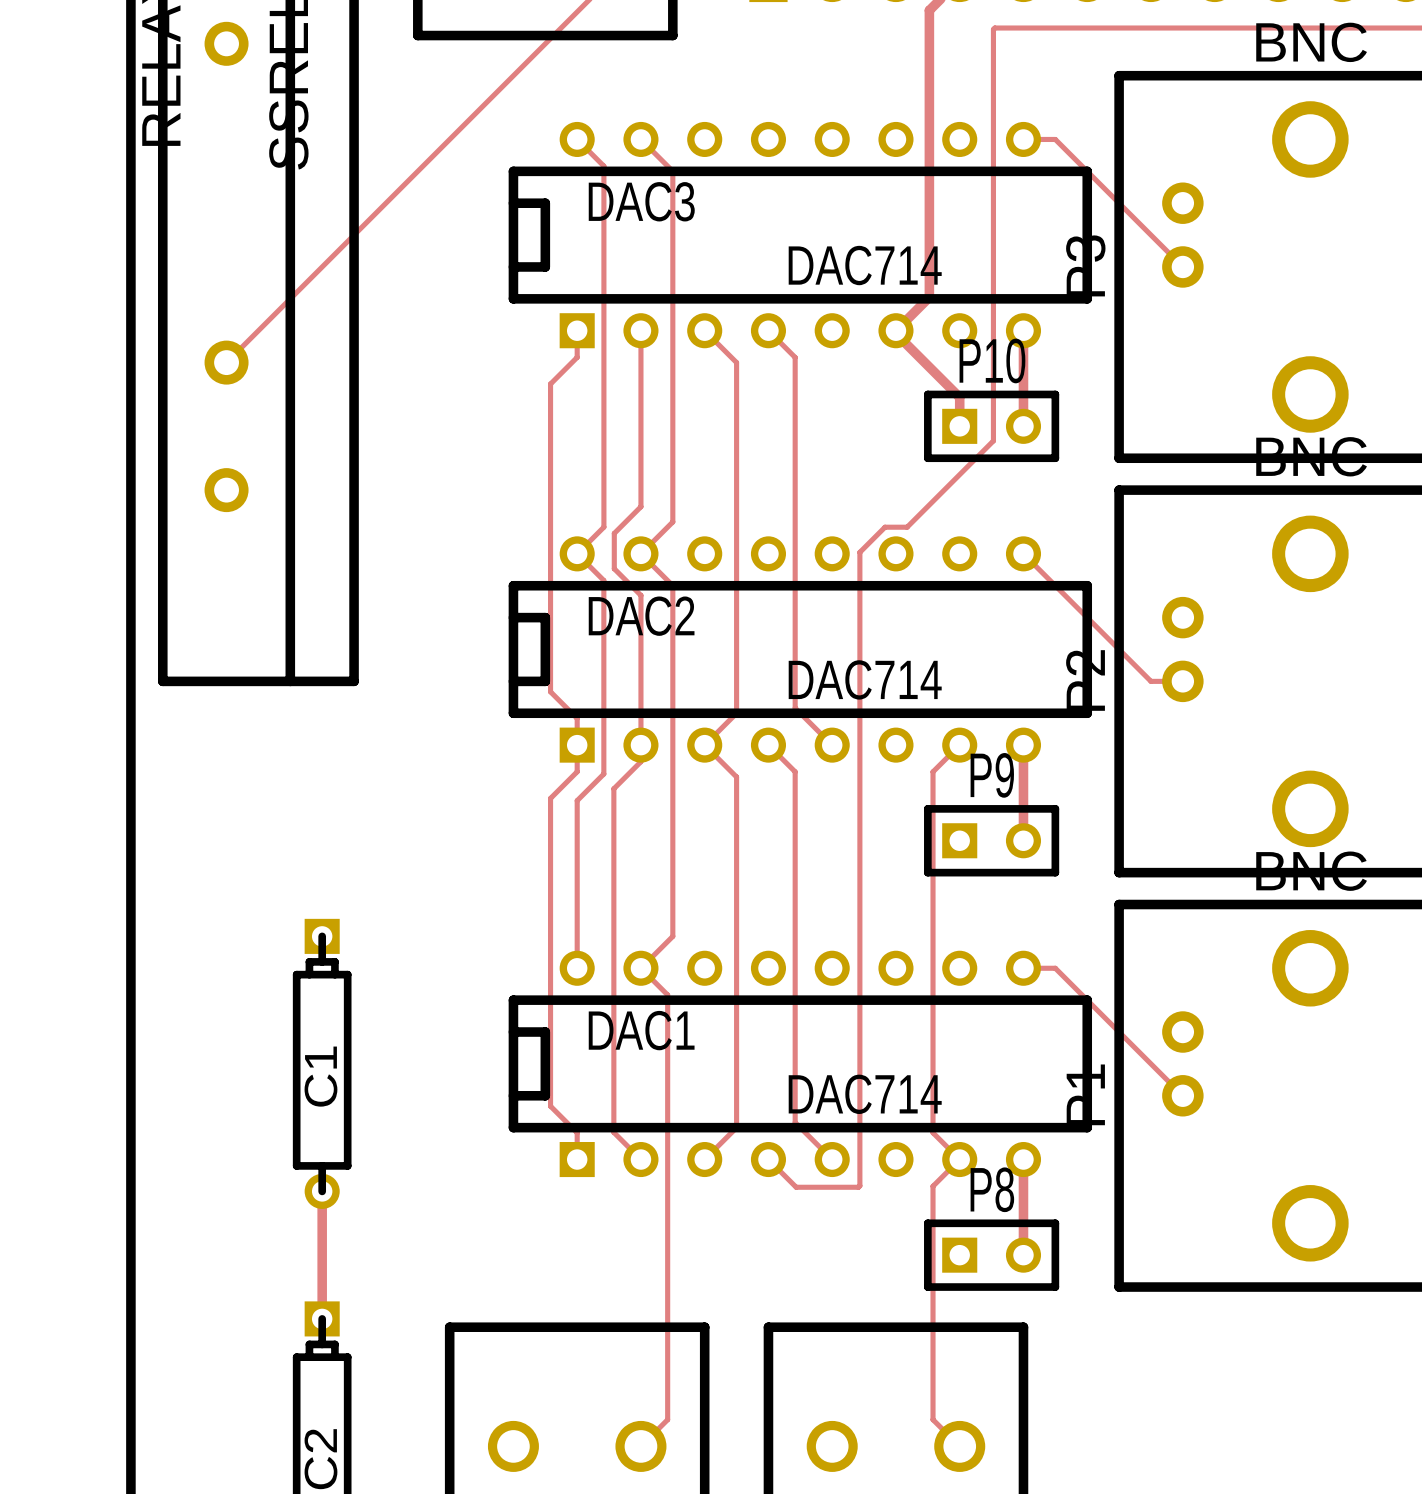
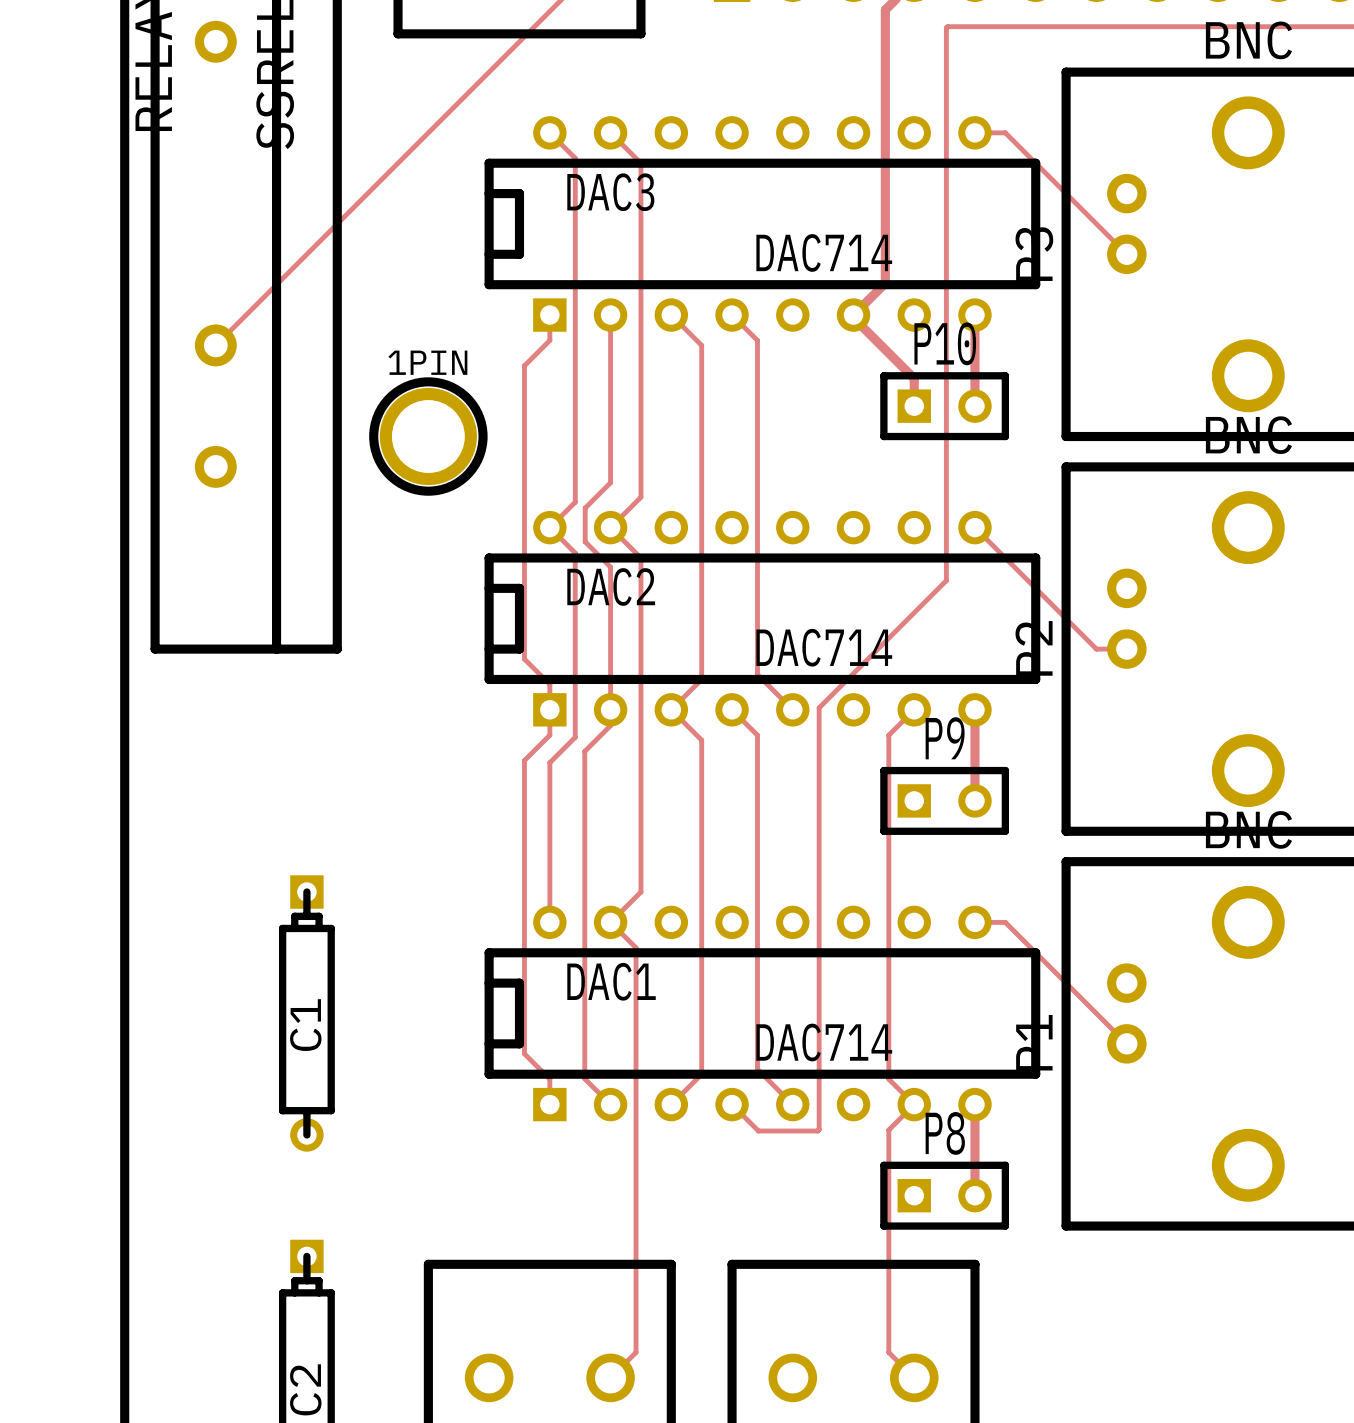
track: (993, 440) (907, 527) (885, 527) (859, 552) (859, 743) -> (946, 420) (946, 580) (819, 707)
1PIN: none -> (428, 436)
track: (322, 1191) (322, 1318) -> none

